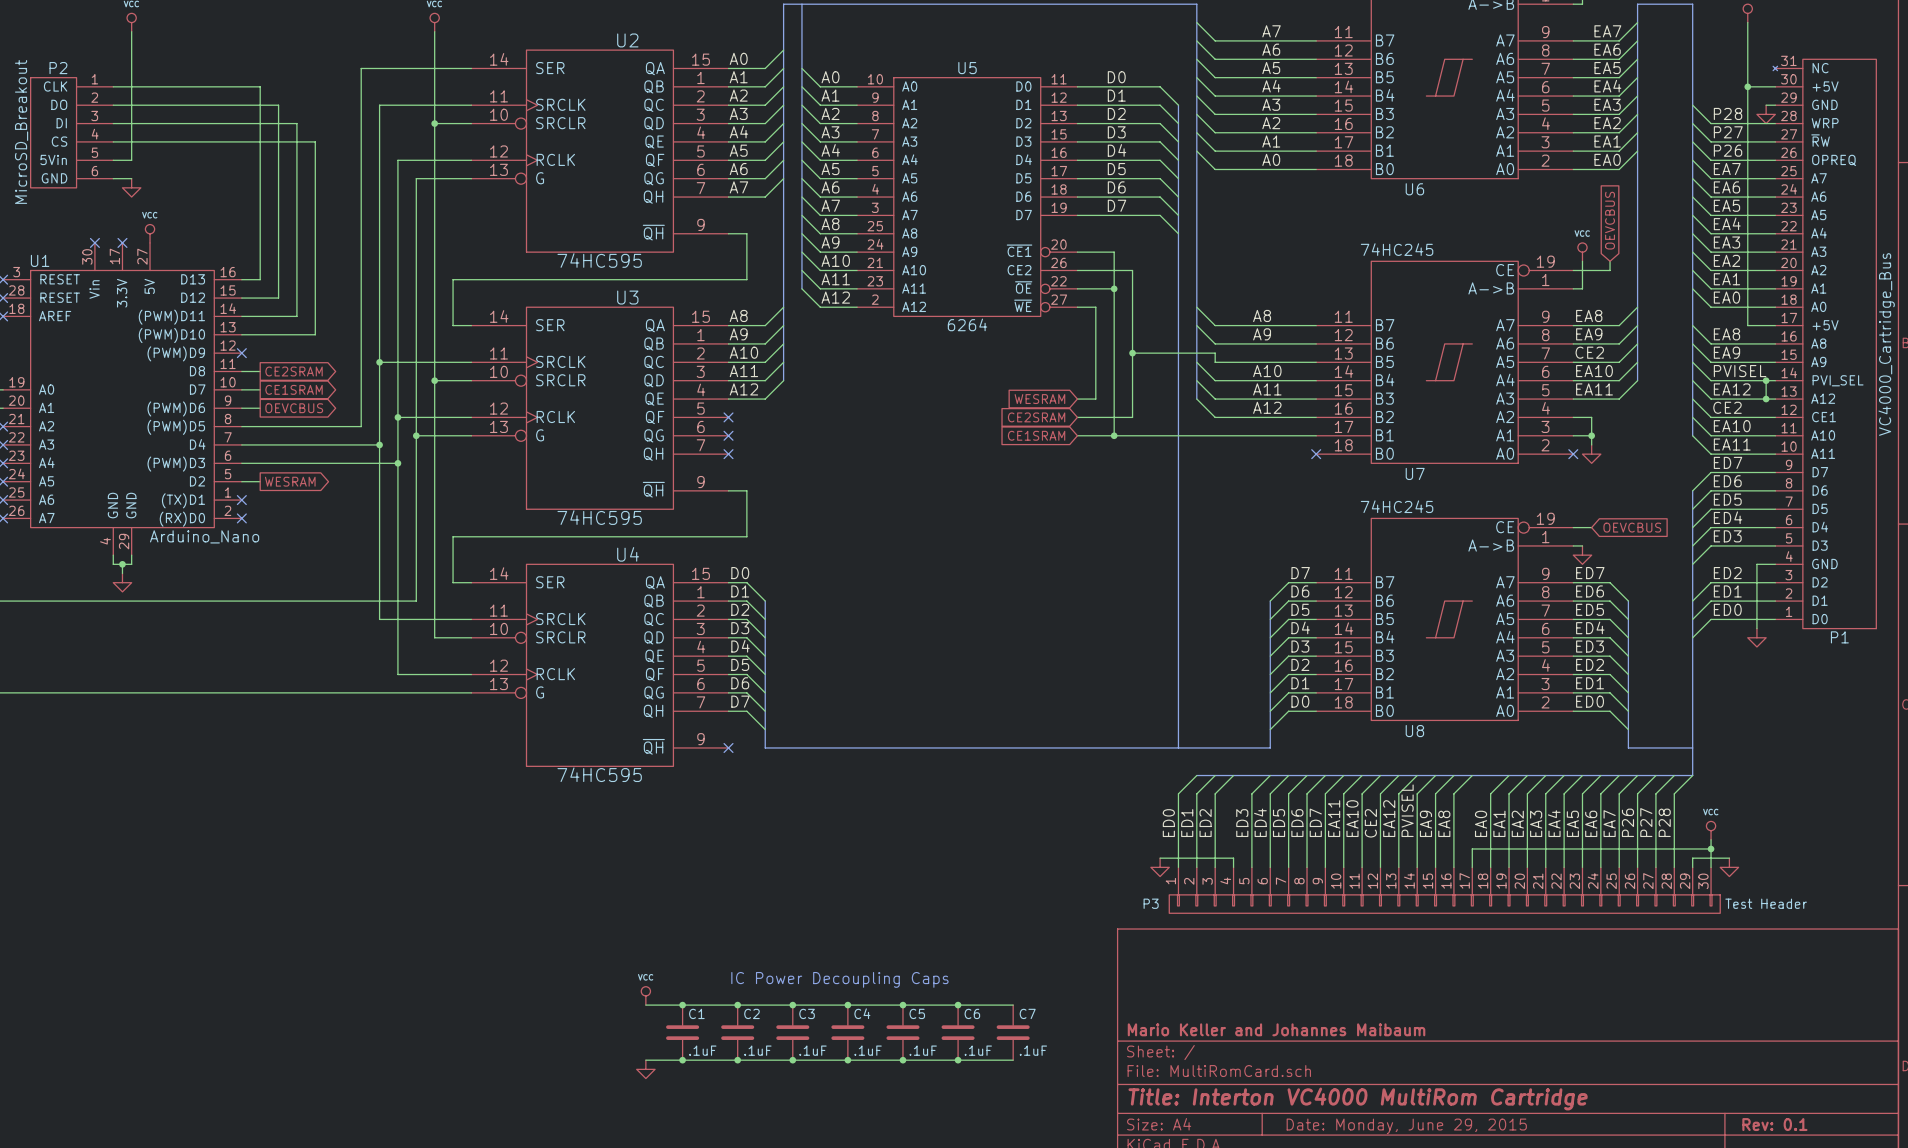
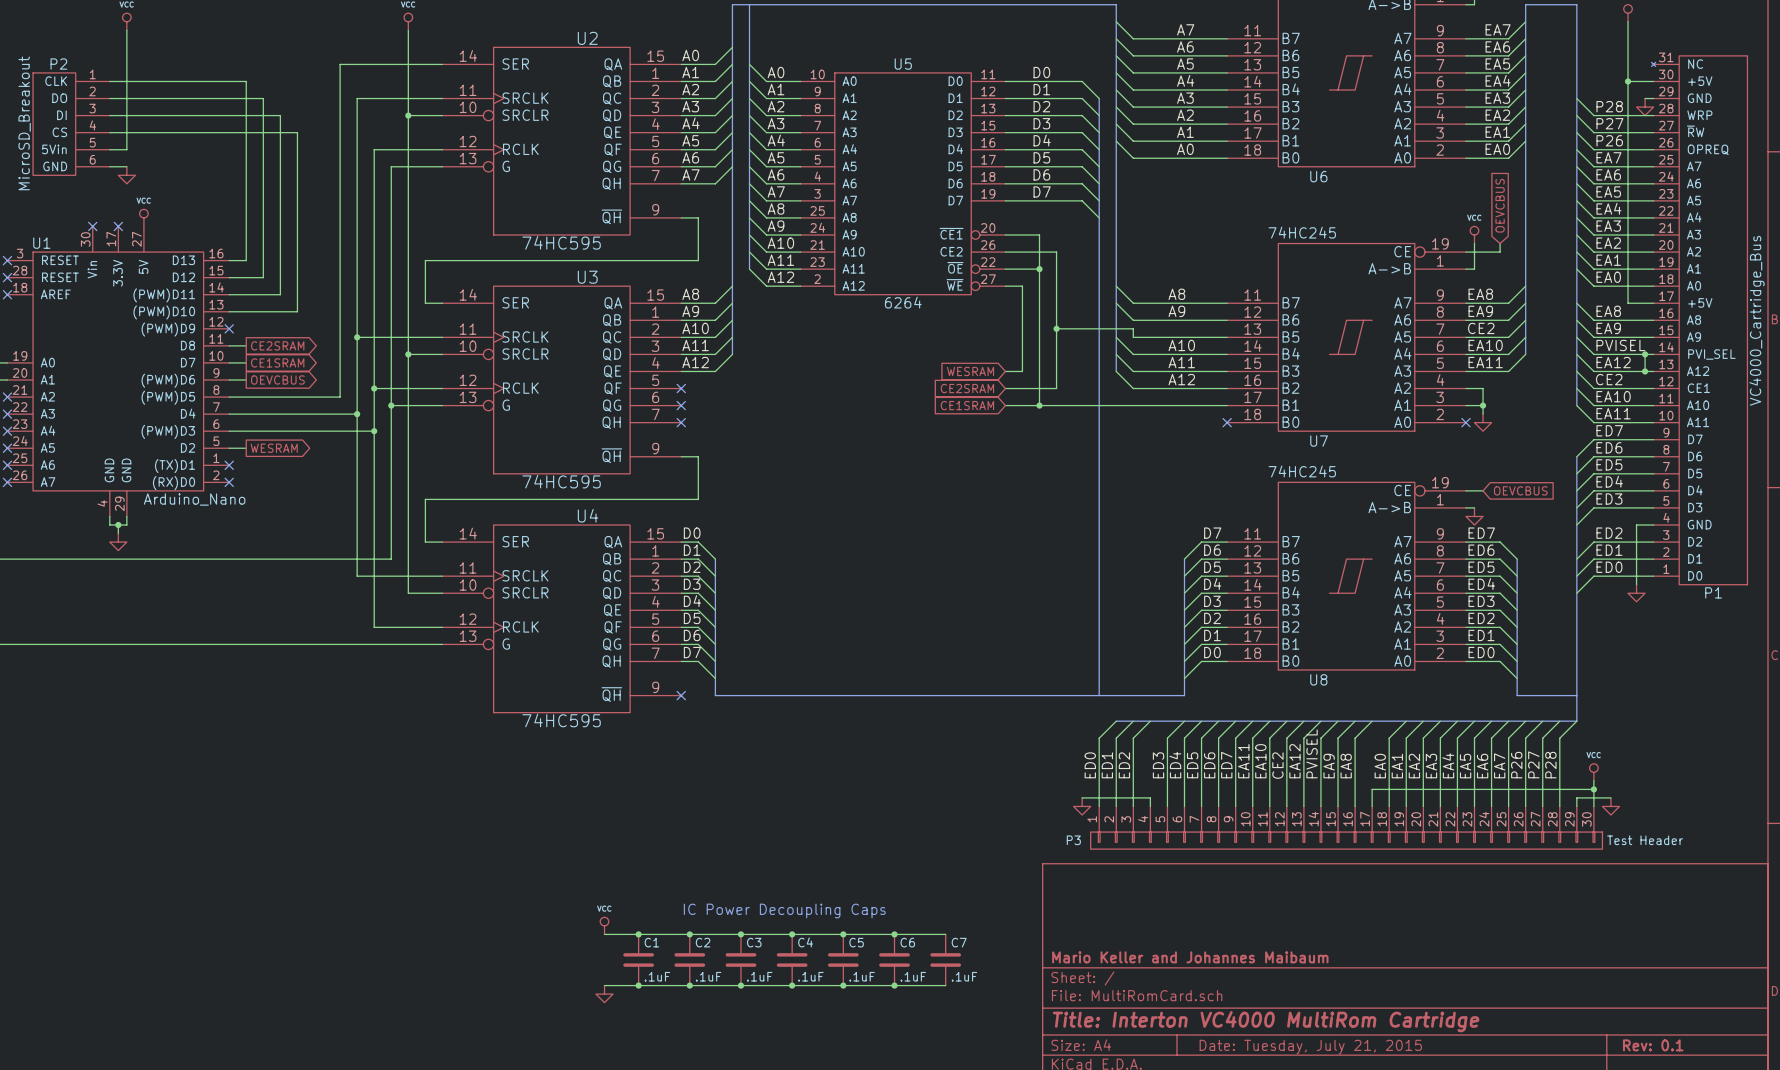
title block: Date: Monday, June 29, 2015 (1406, 1126) -> Date: Tuesday, July 21, 2015 (1310, 1047)

